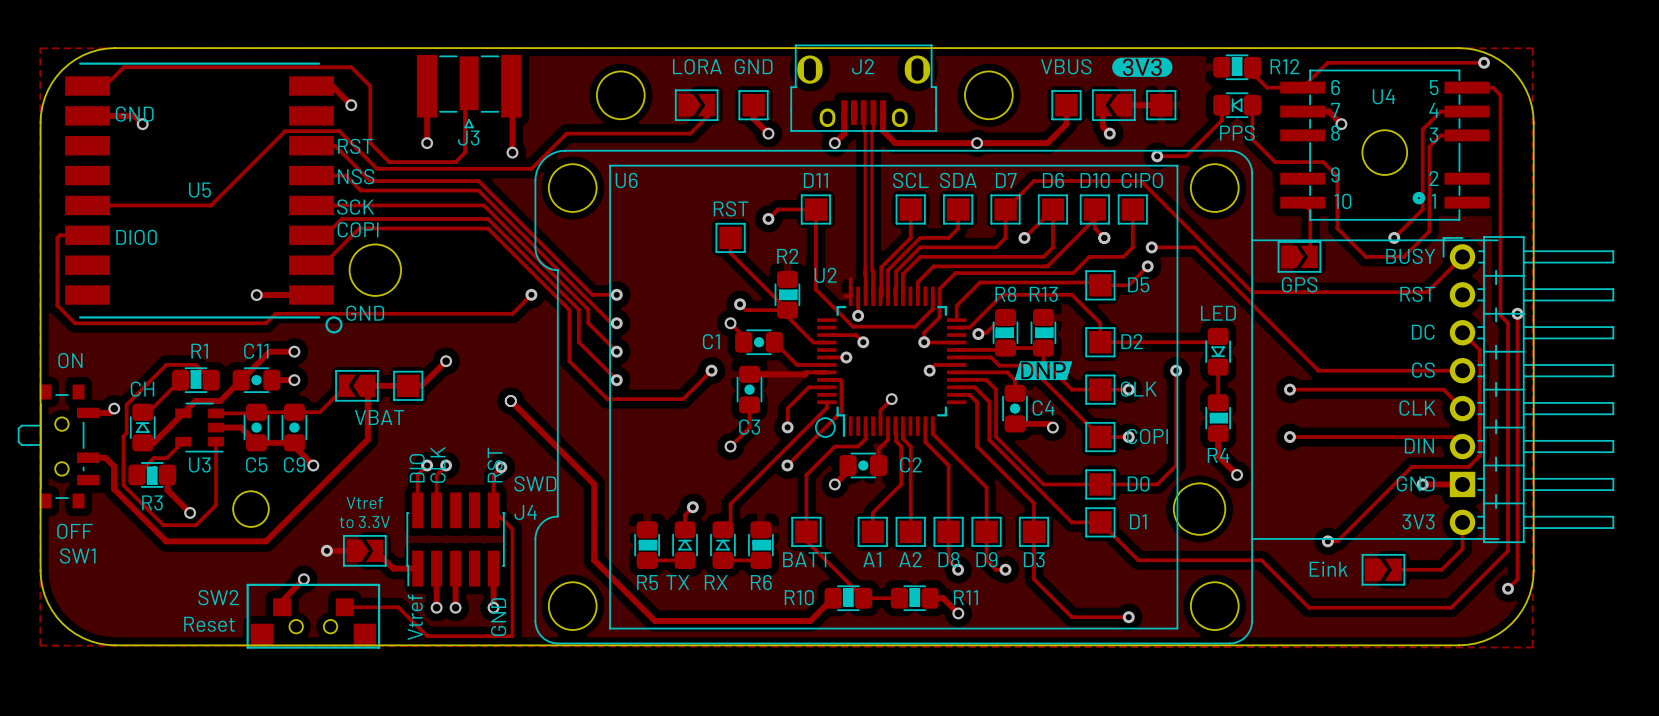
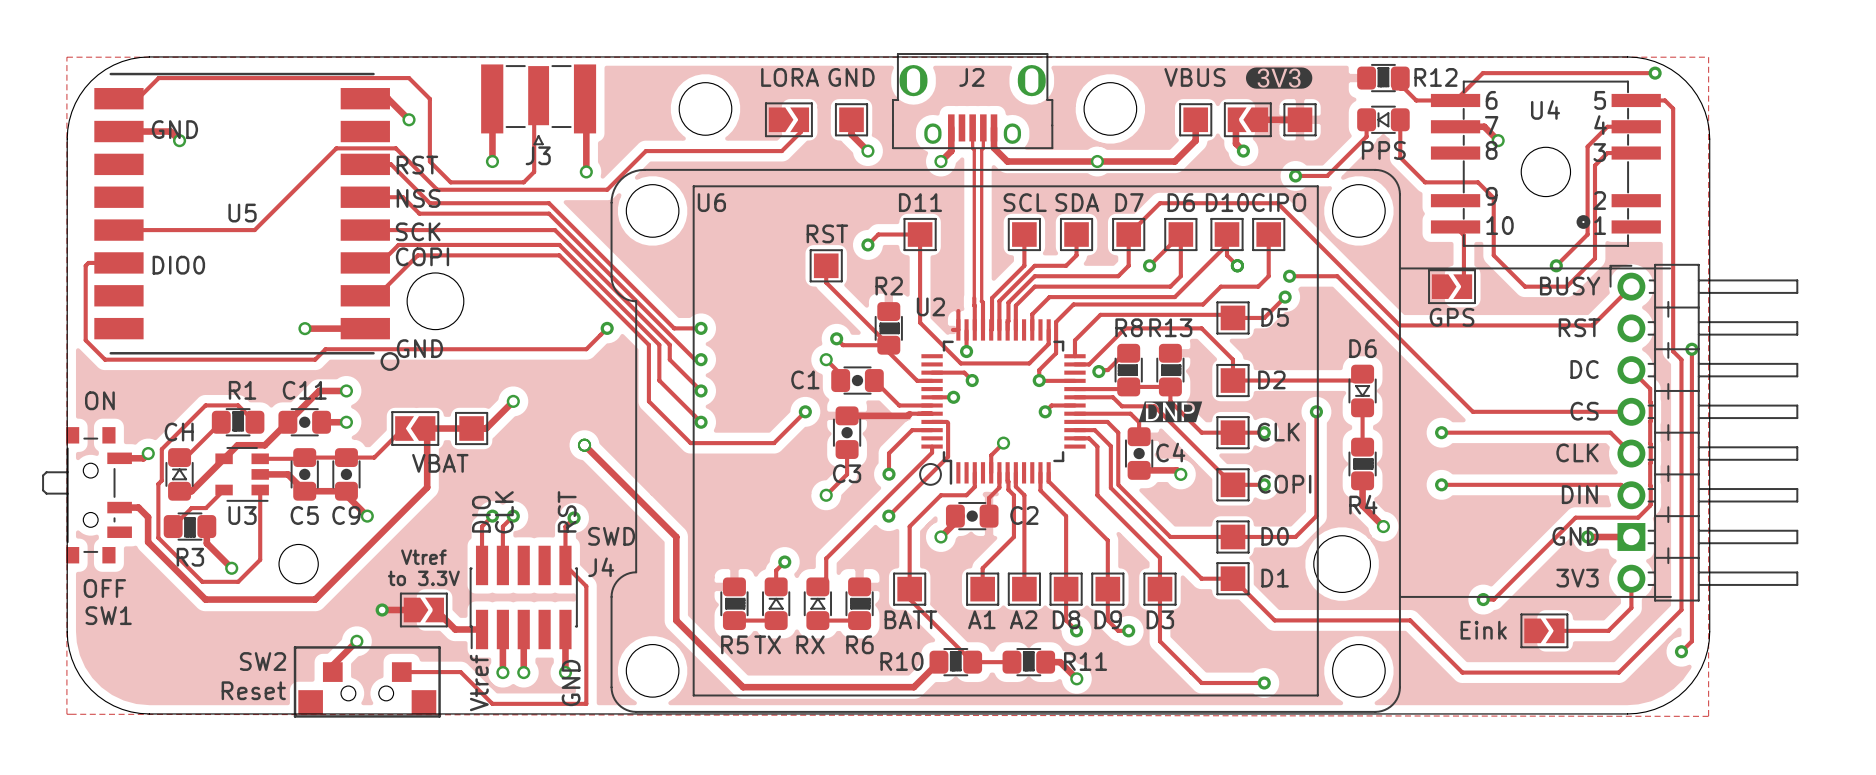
D6 name: none -> D6 (1362, 348)
text: LED (1218, 313) -> none

